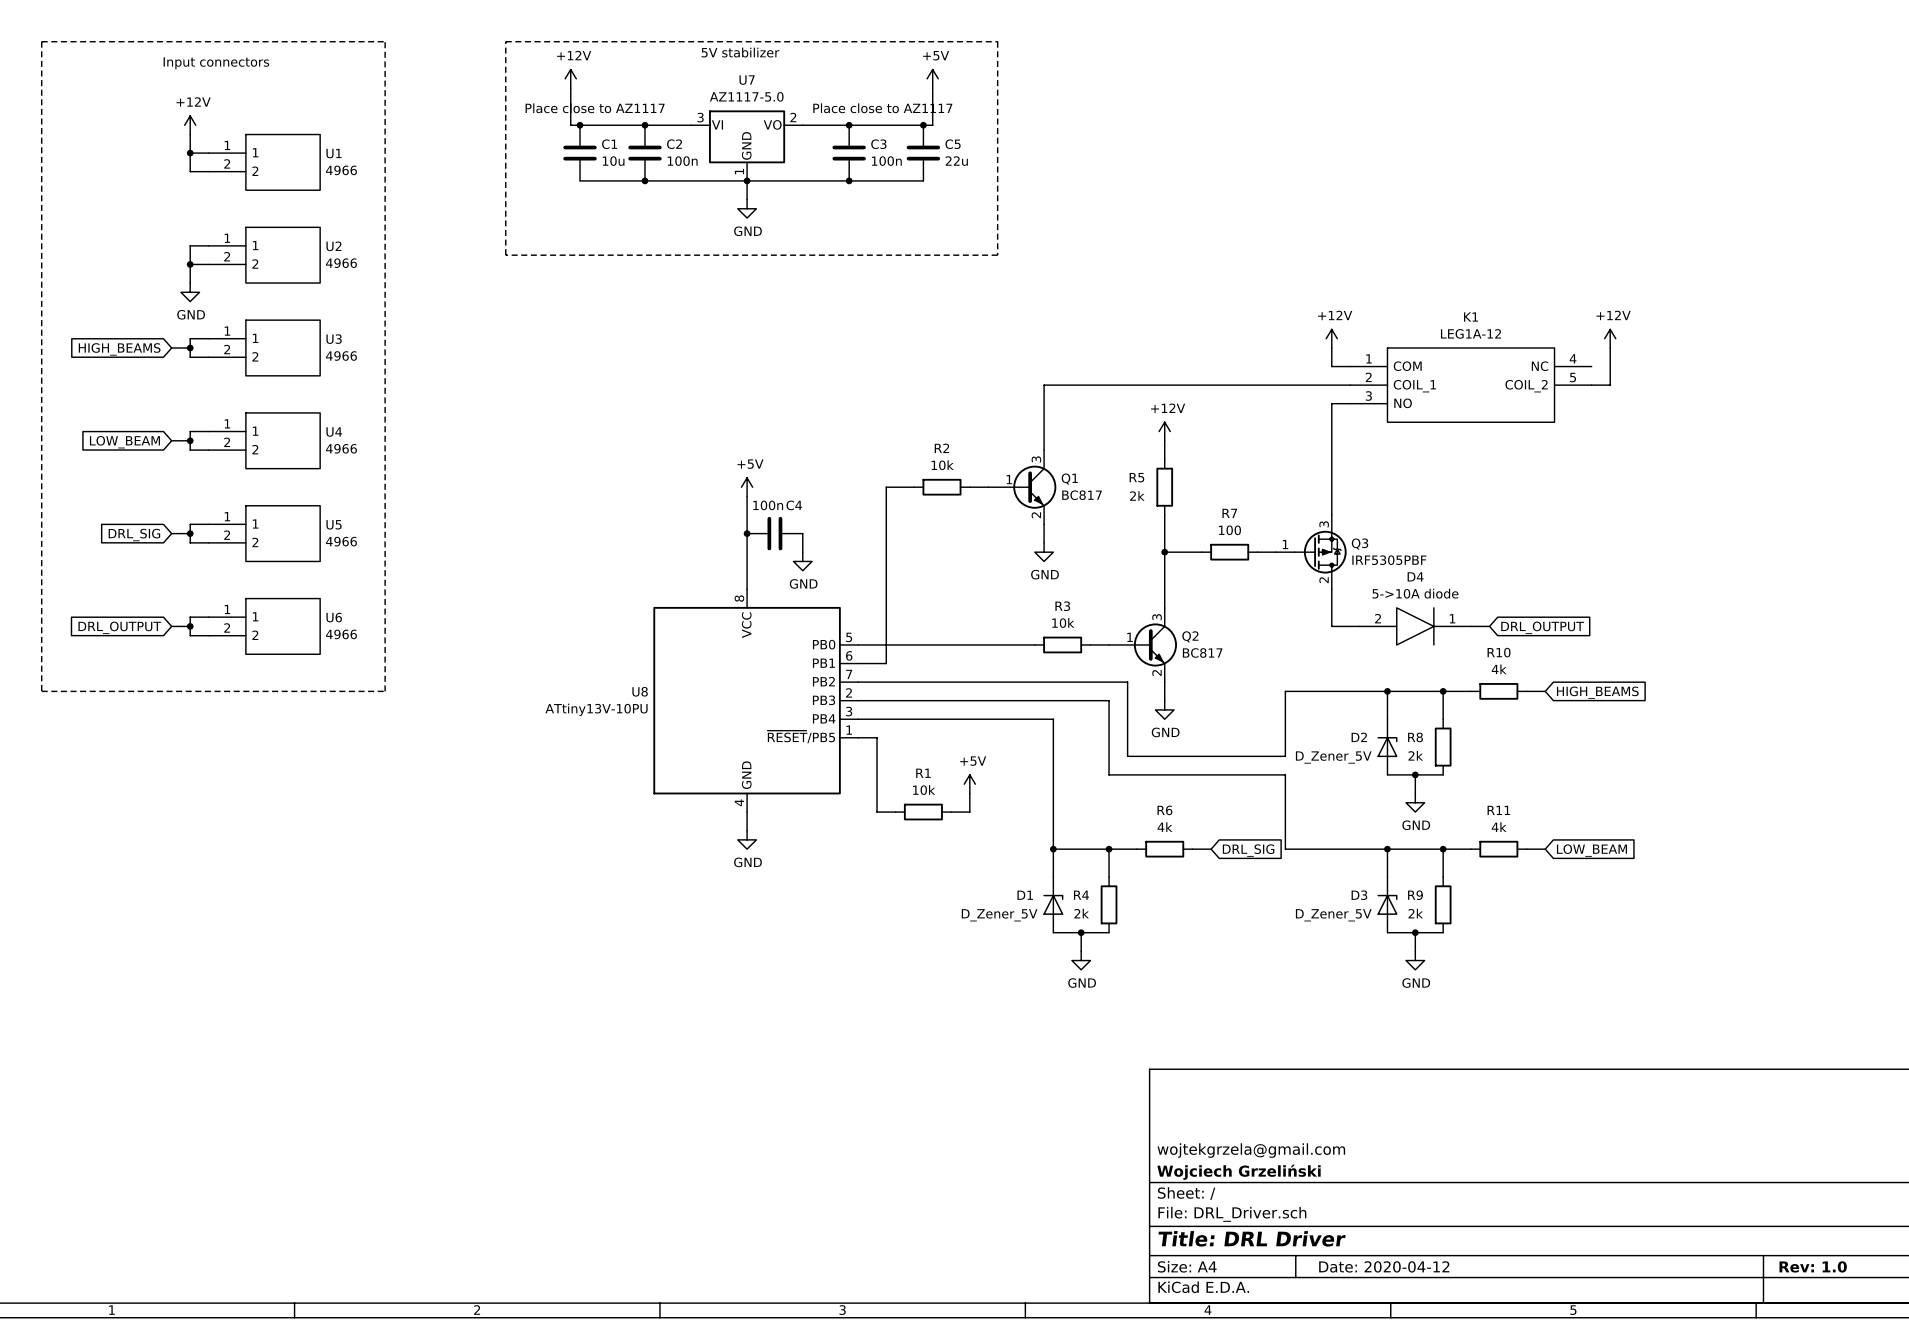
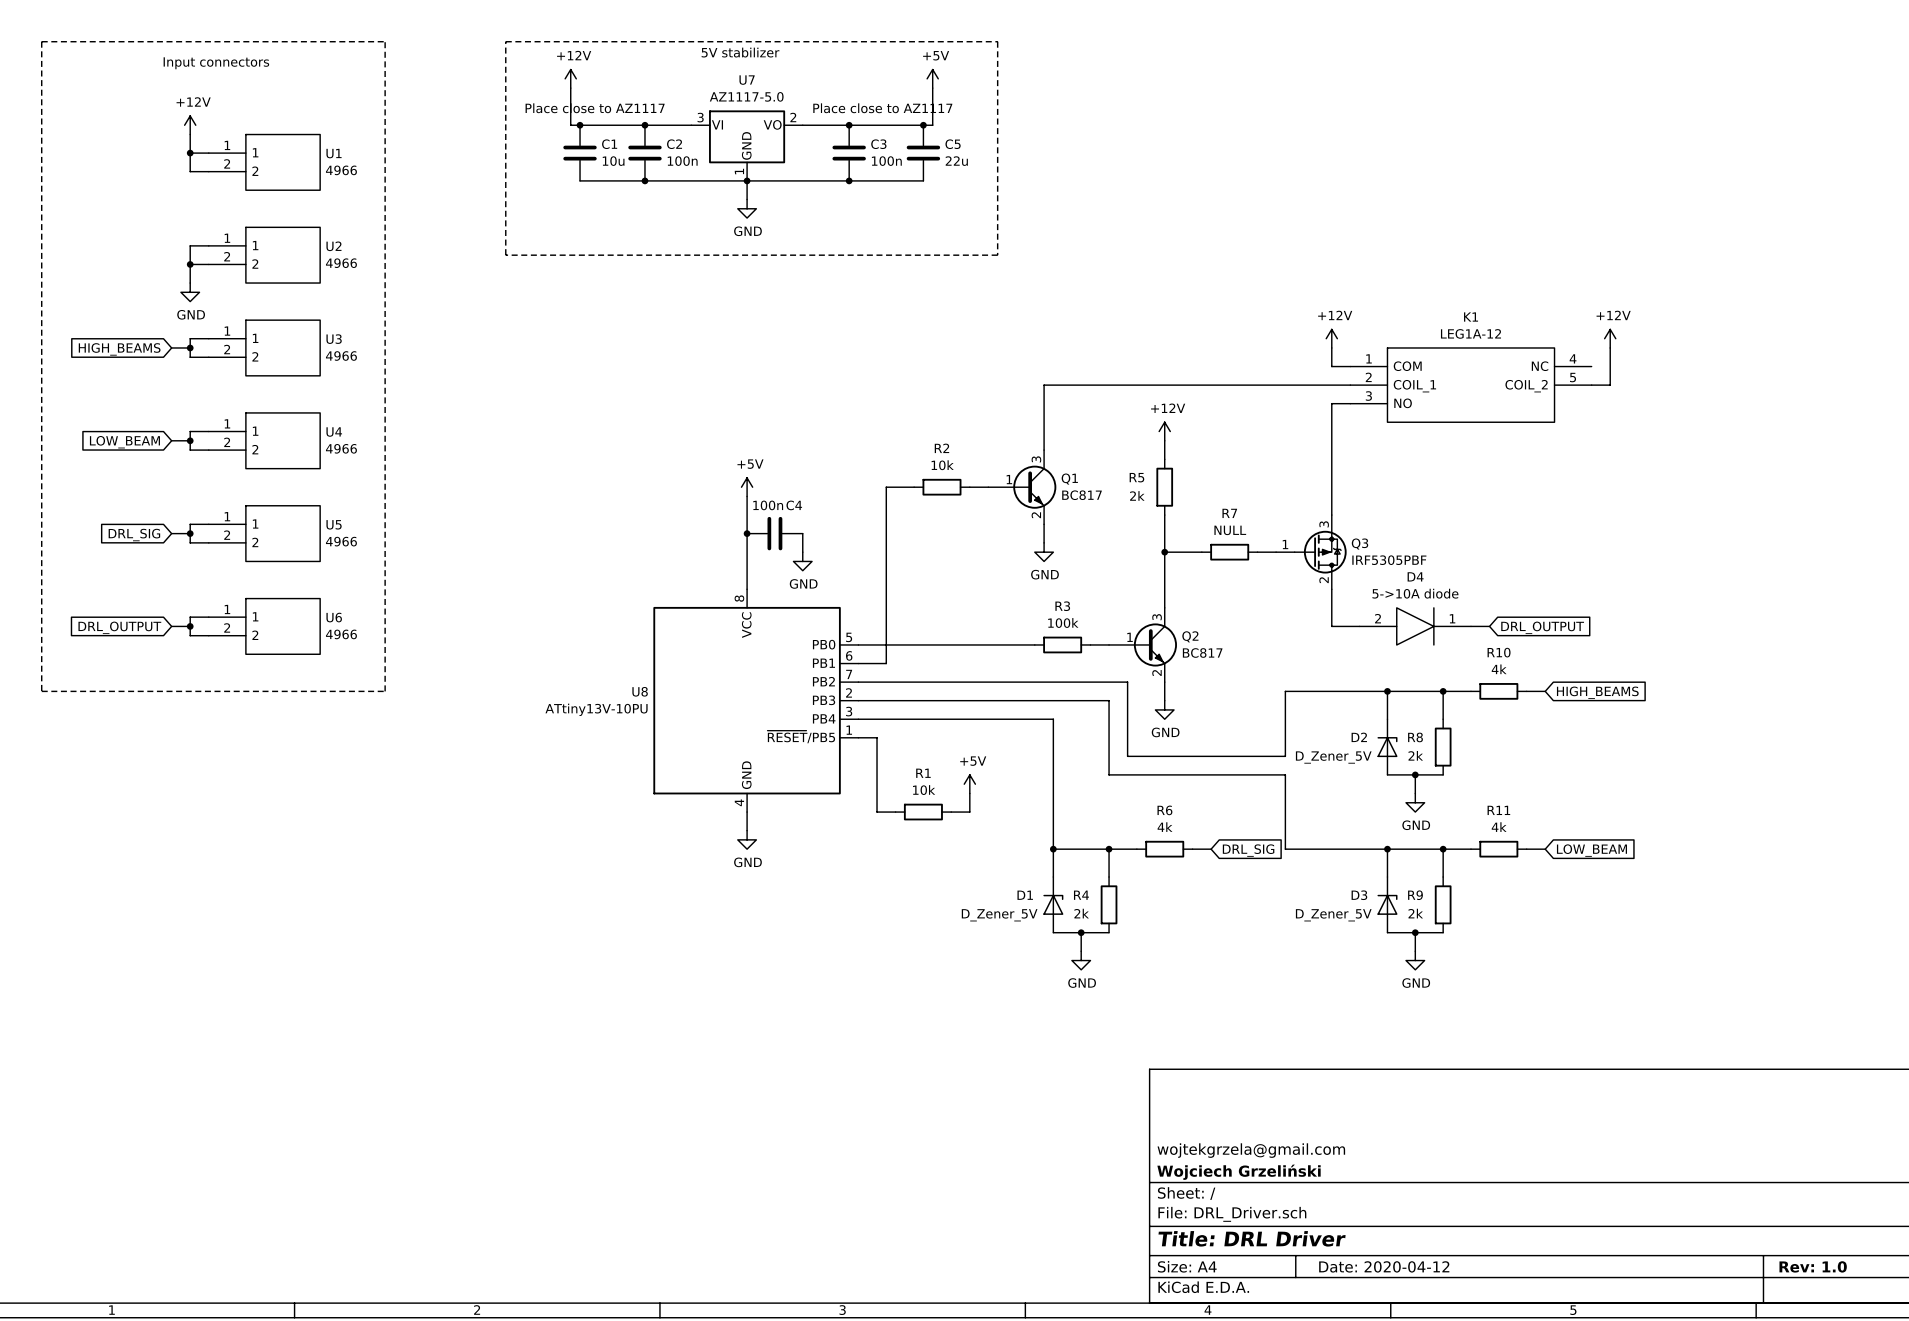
R7 value: 100 (1229, 530) -> NULL (1230, 530)
R3 value: 10k (1063, 623) -> 100k (1063, 623)

